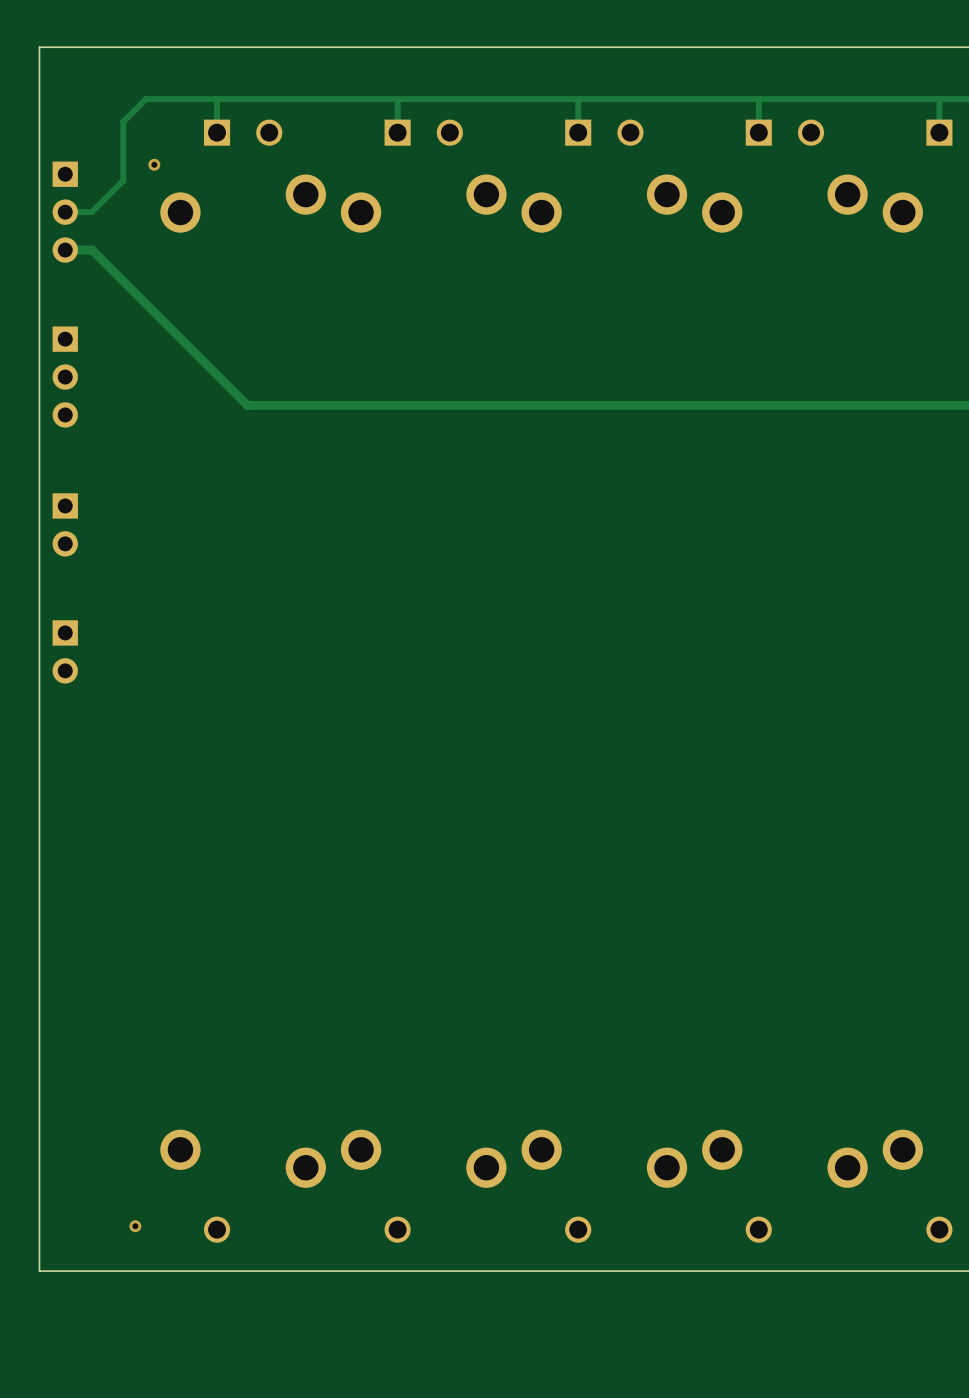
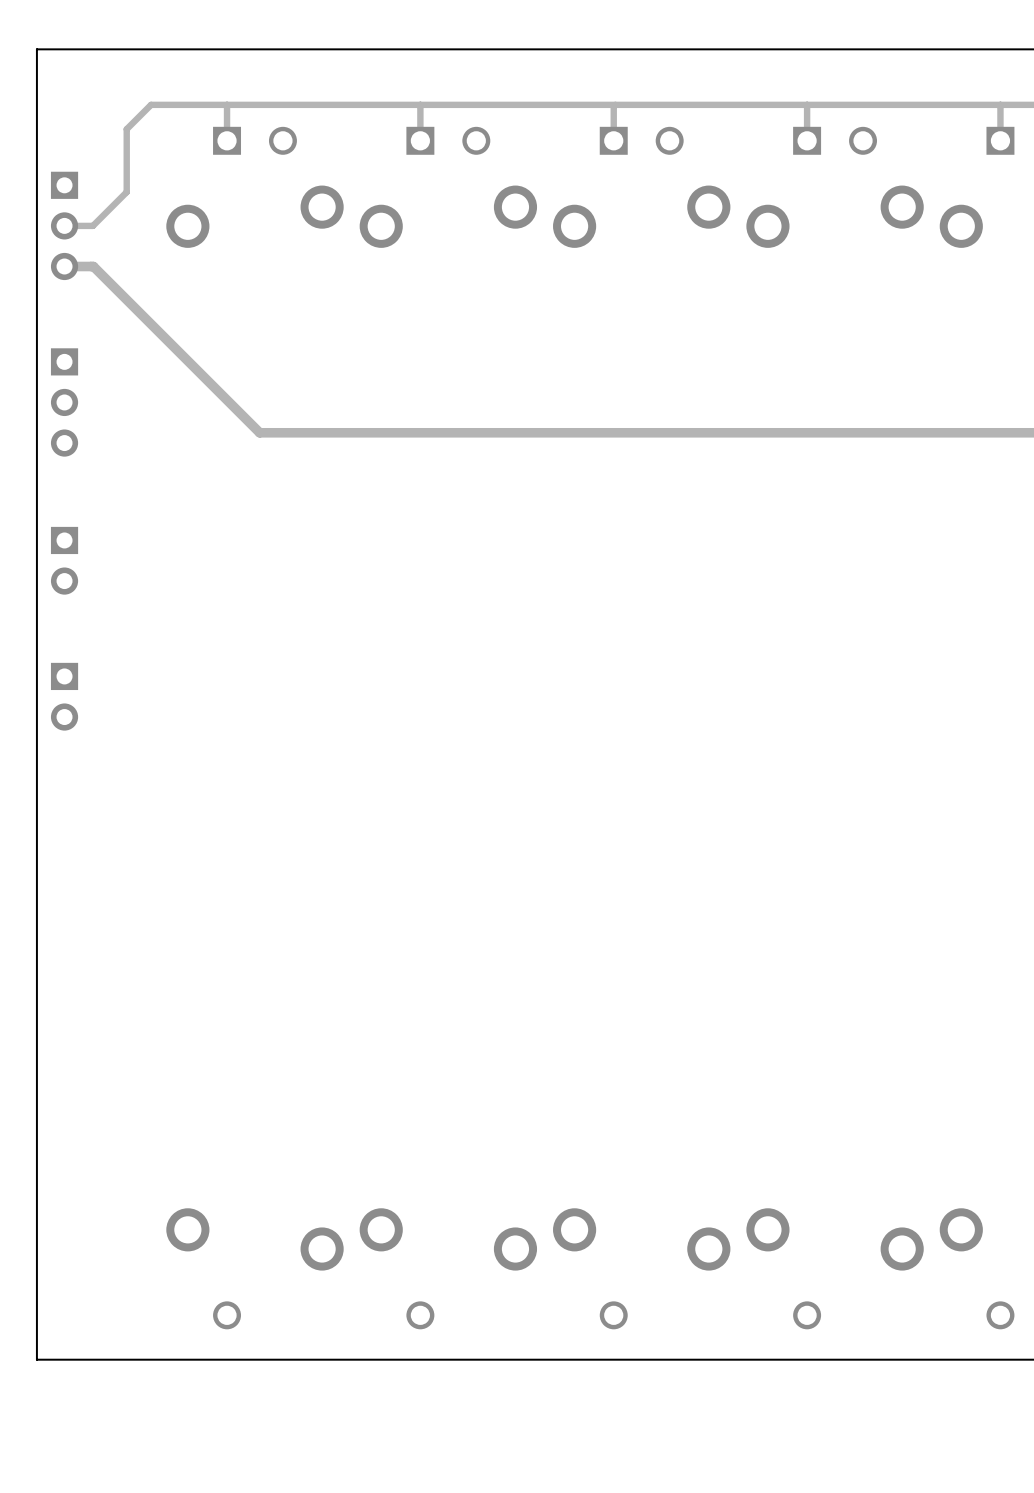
via: (154, 164) -> none
via: (135, 1226) -> none

